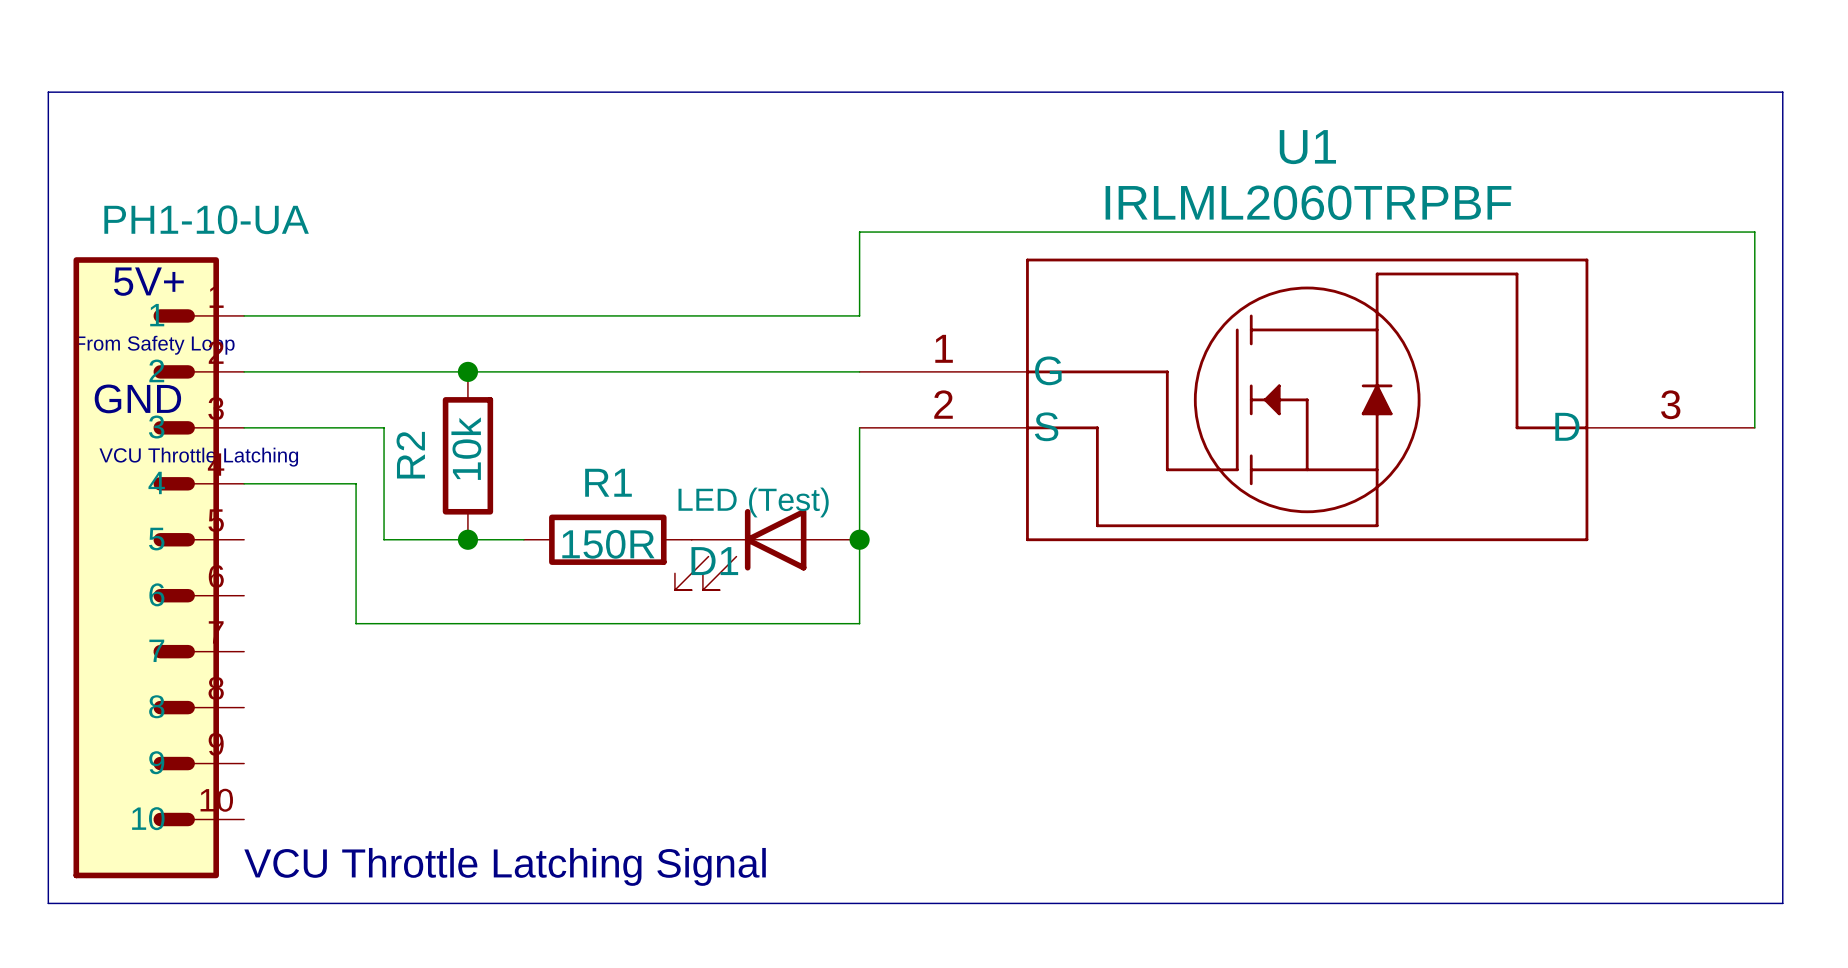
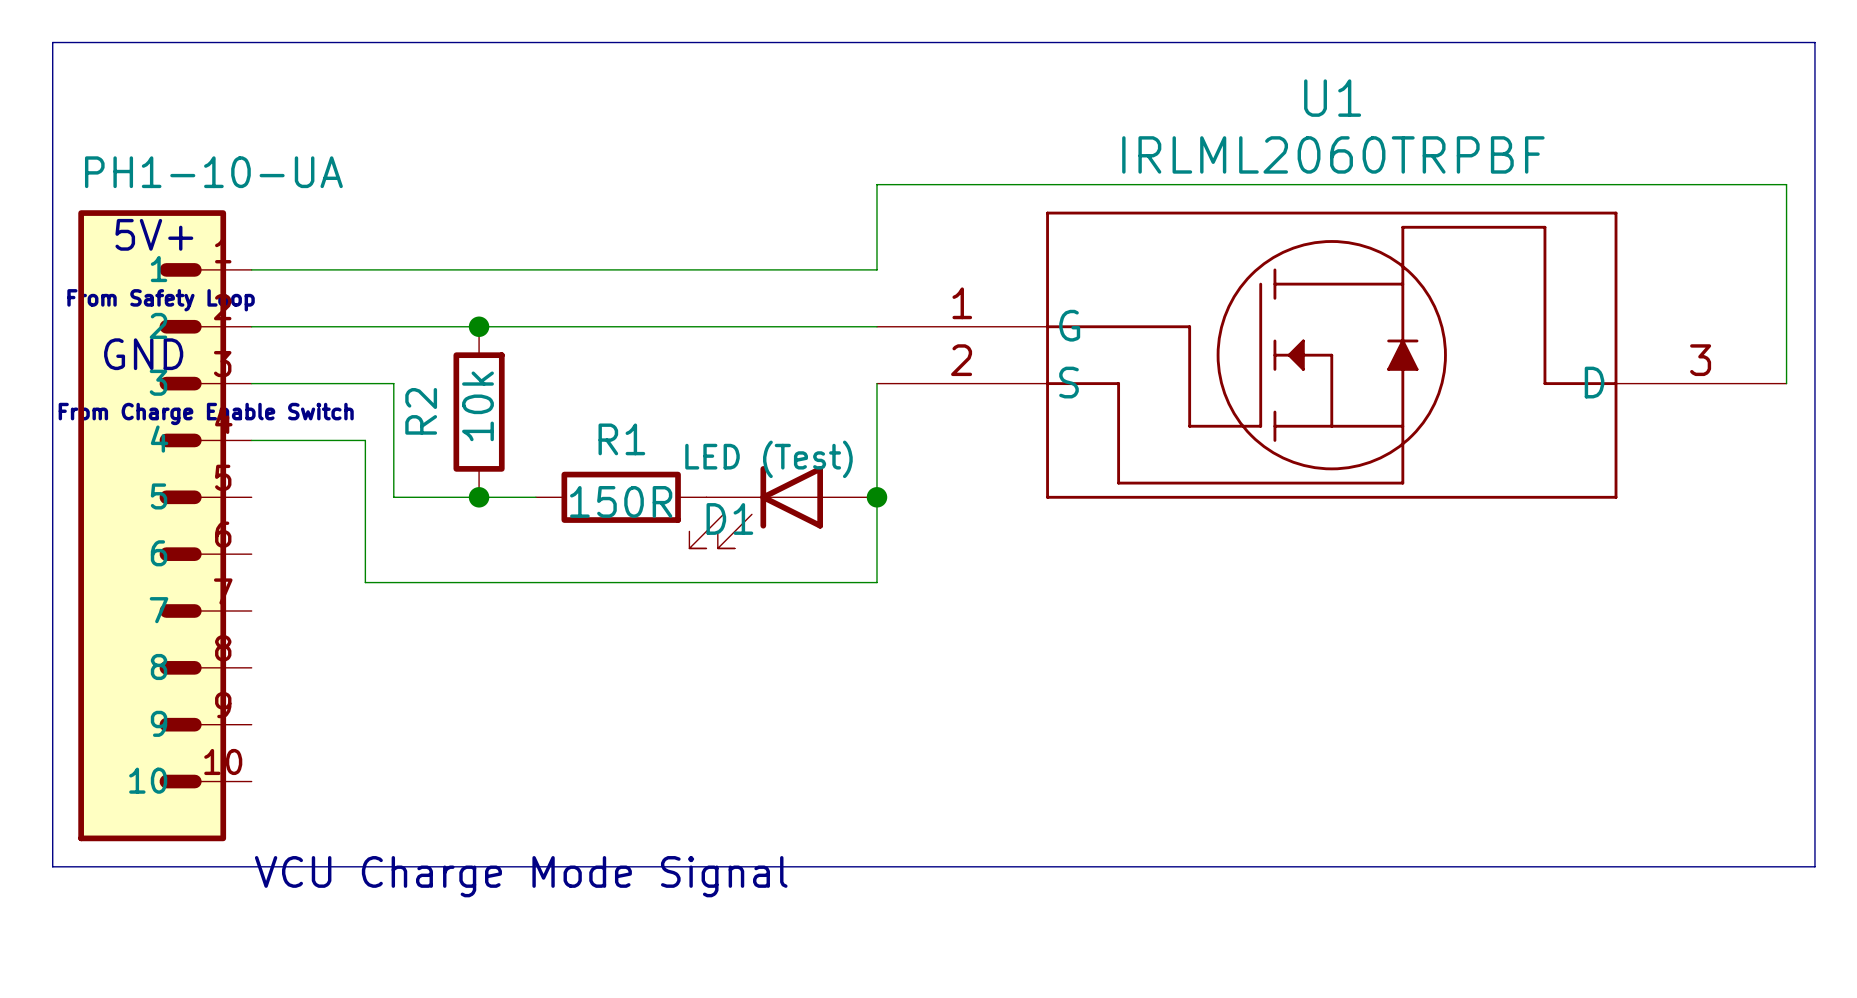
text: VCU Throttle Latching (198, 457) -> From Charge Enable Switch (206, 413)
text: VCU Throttle Latching Signal (505, 866) -> none
text: none -> VCU Charge Mode Signal (521, 876)

